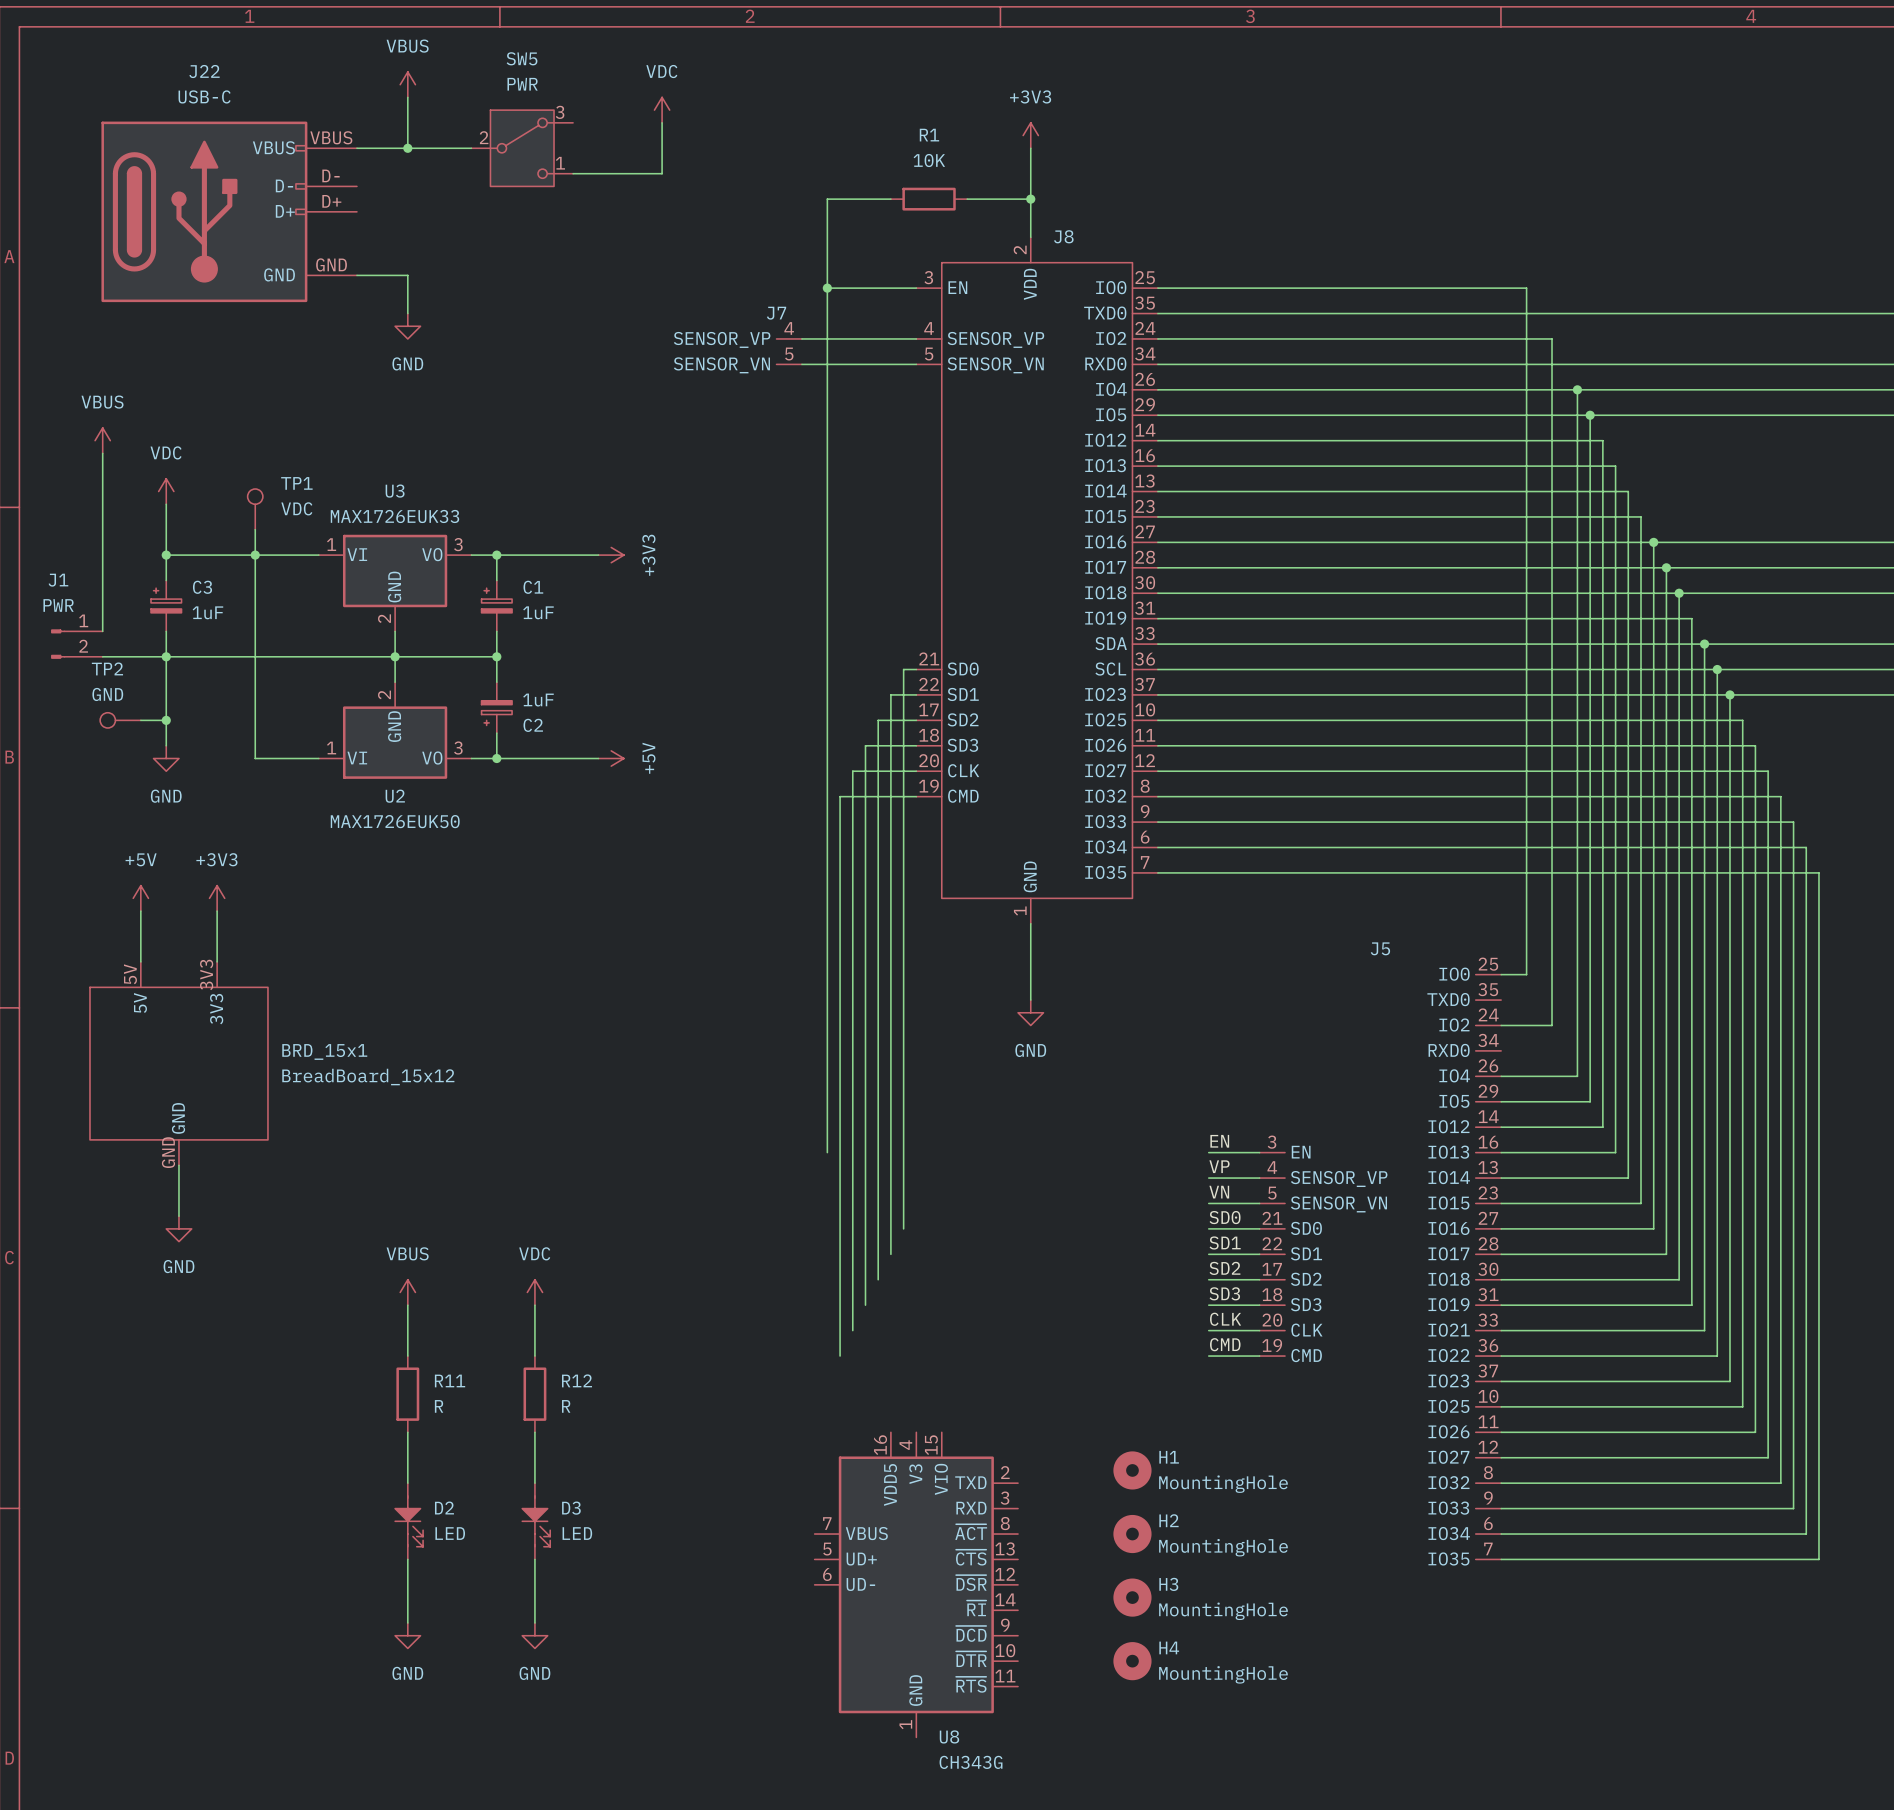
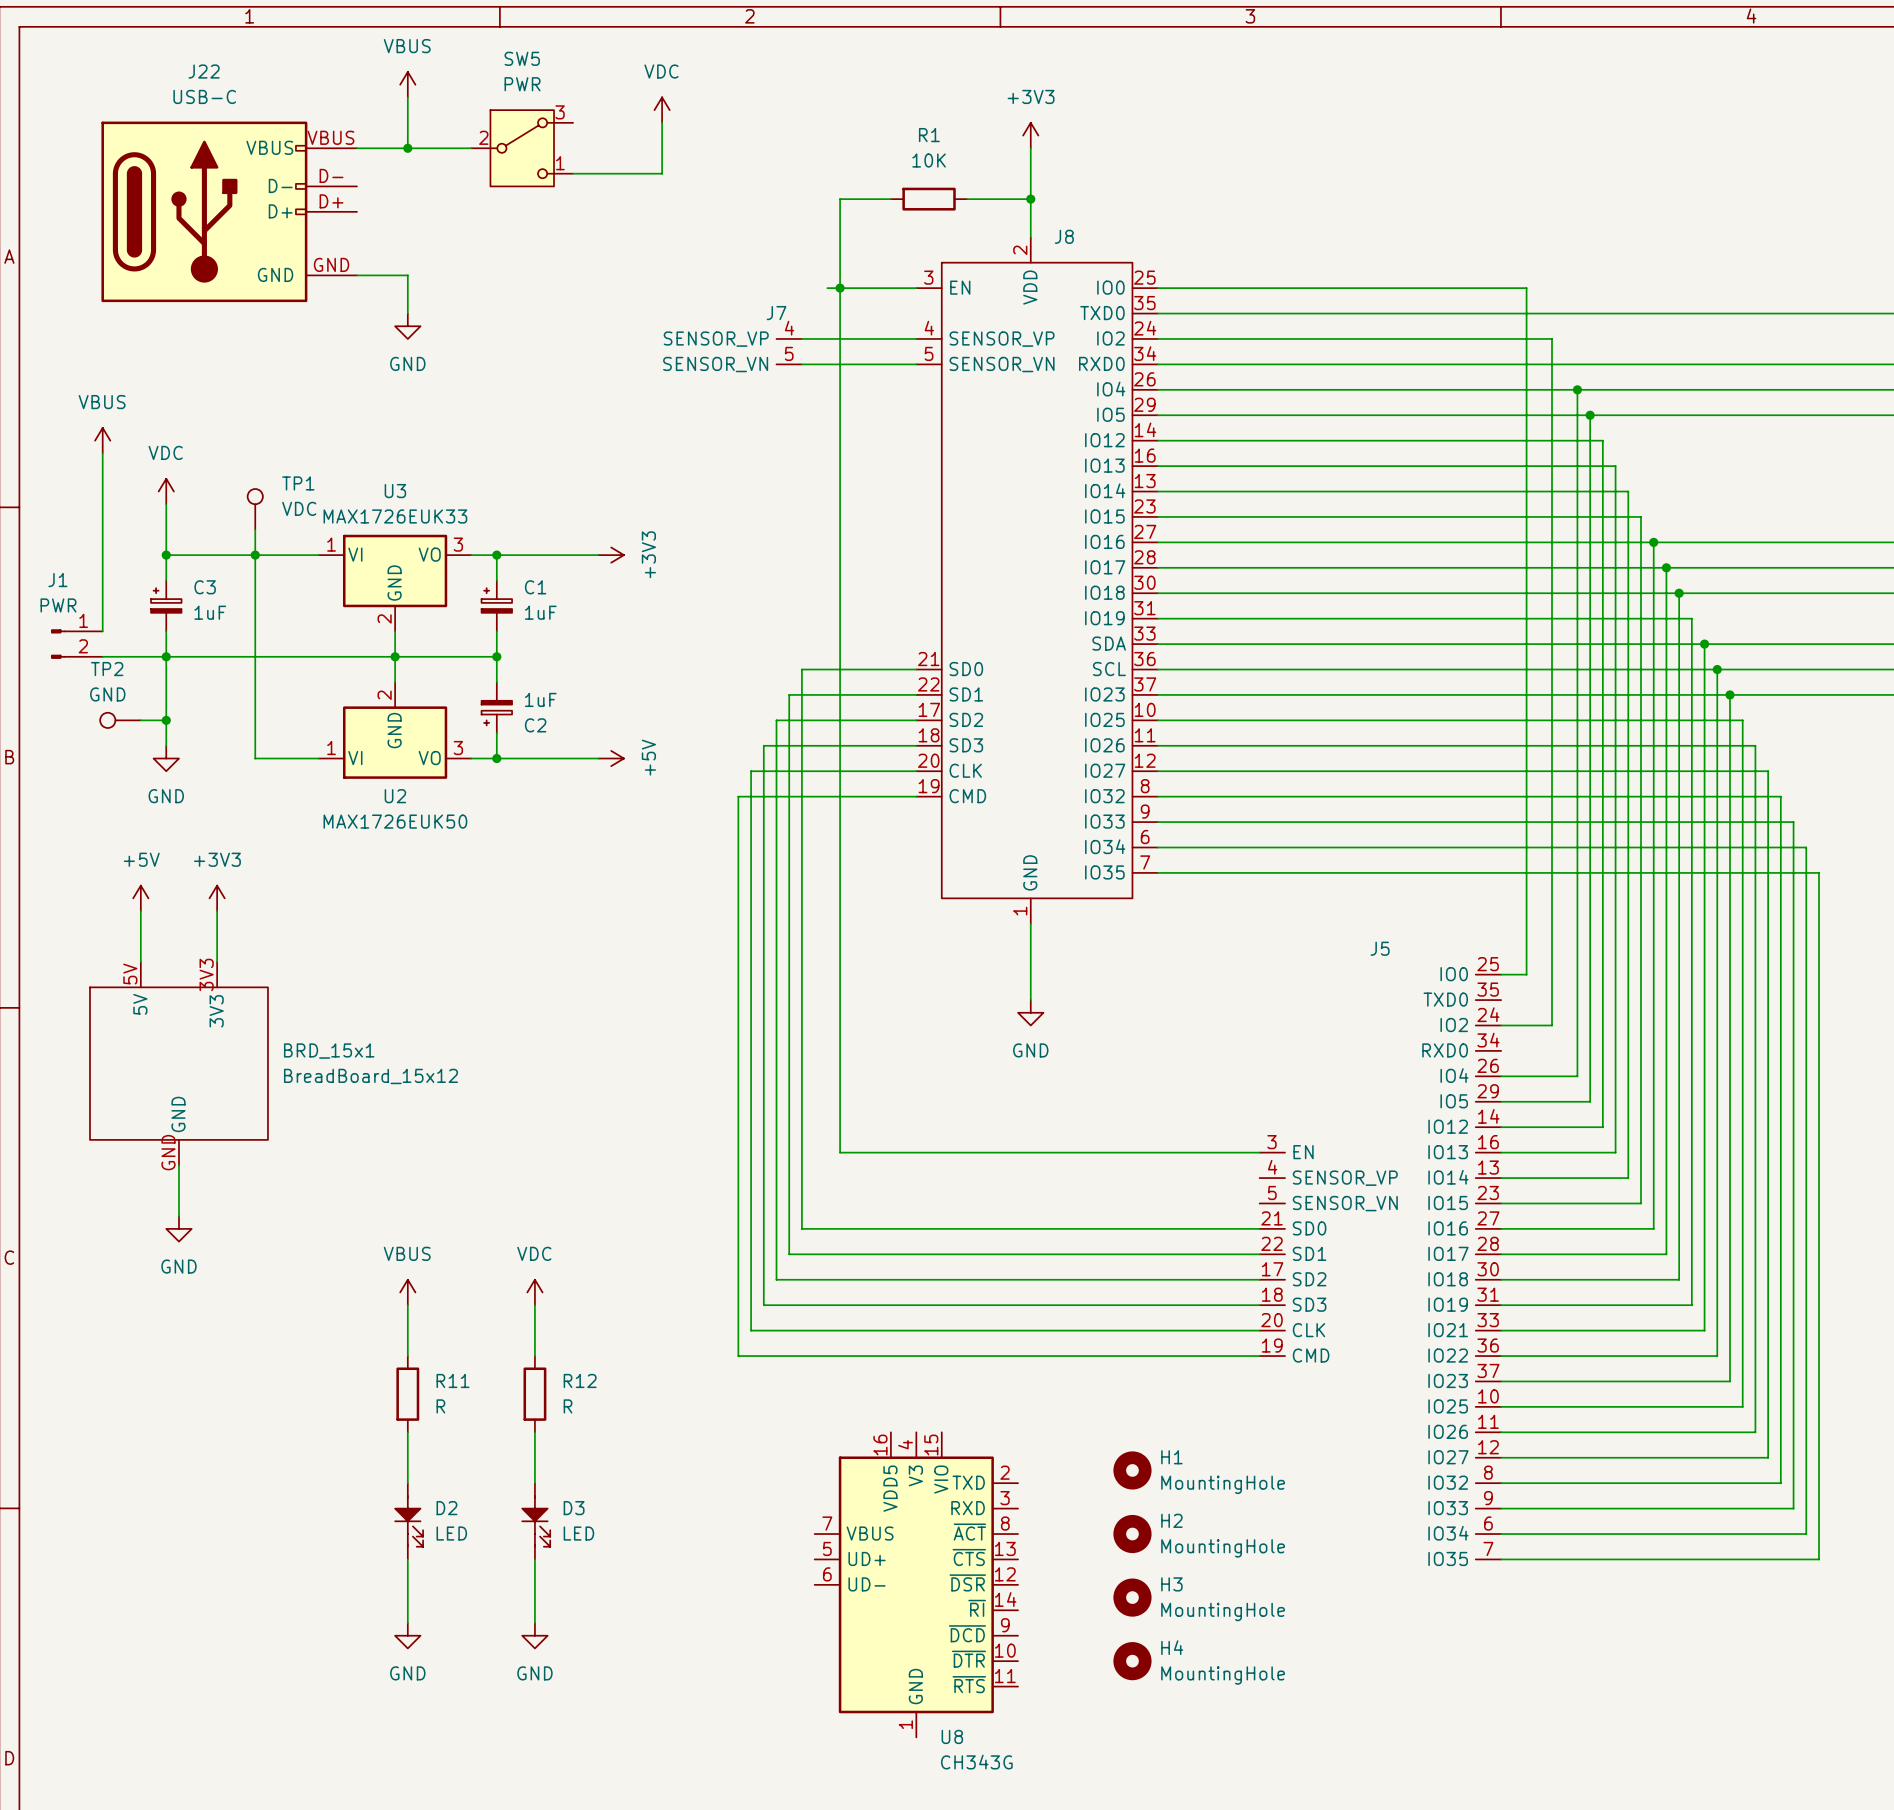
wire: (840, 199) (827, 199) (827, 1152) -> (840, 199) (840, 796) (738, 796) (738, 1356) (1208, 1356)
junction position: (827, 288) -> (840, 288)
wire: (903, 669) (903, 1228) -> (903, 669) (801, 669) (801, 1228) (1208, 1228)
wire: (890, 694) (890, 1254) -> (890, 694) (789, 694) (789, 1254) (1208, 1254)
wire: (878, 720) (878, 1279) -> (878, 720) (776, 720) (776, 1279) (1208, 1279)
wire: (865, 745) (865, 1305) -> (865, 745) (763, 745) (763, 1305) (1208, 1305)
wire: (852, 771) (852, 1330) -> (852, 771) (751, 771) (751, 1330) (1208, 1330)
label: EN (1219, 1141) -> none
wire: (840, 1152) (840, 1356) -> (840, 1152) (1208, 1152)
label: VP (1219, 1166) -> none
wire: (1208, 1178) (1259, 1178) -> none
label: VN (1219, 1192) -> none
wire: (1208, 1203) (1259, 1203) -> none
label: SD0 (1225, 1217) -> none
label: SD1 (1225, 1242) -> none
label: SD2 (1224, 1268) -> none
label: SD3 (1224, 1293) -> none
label: CLK (1225, 1319) -> none
label: CMD (1225, 1344) -> none

